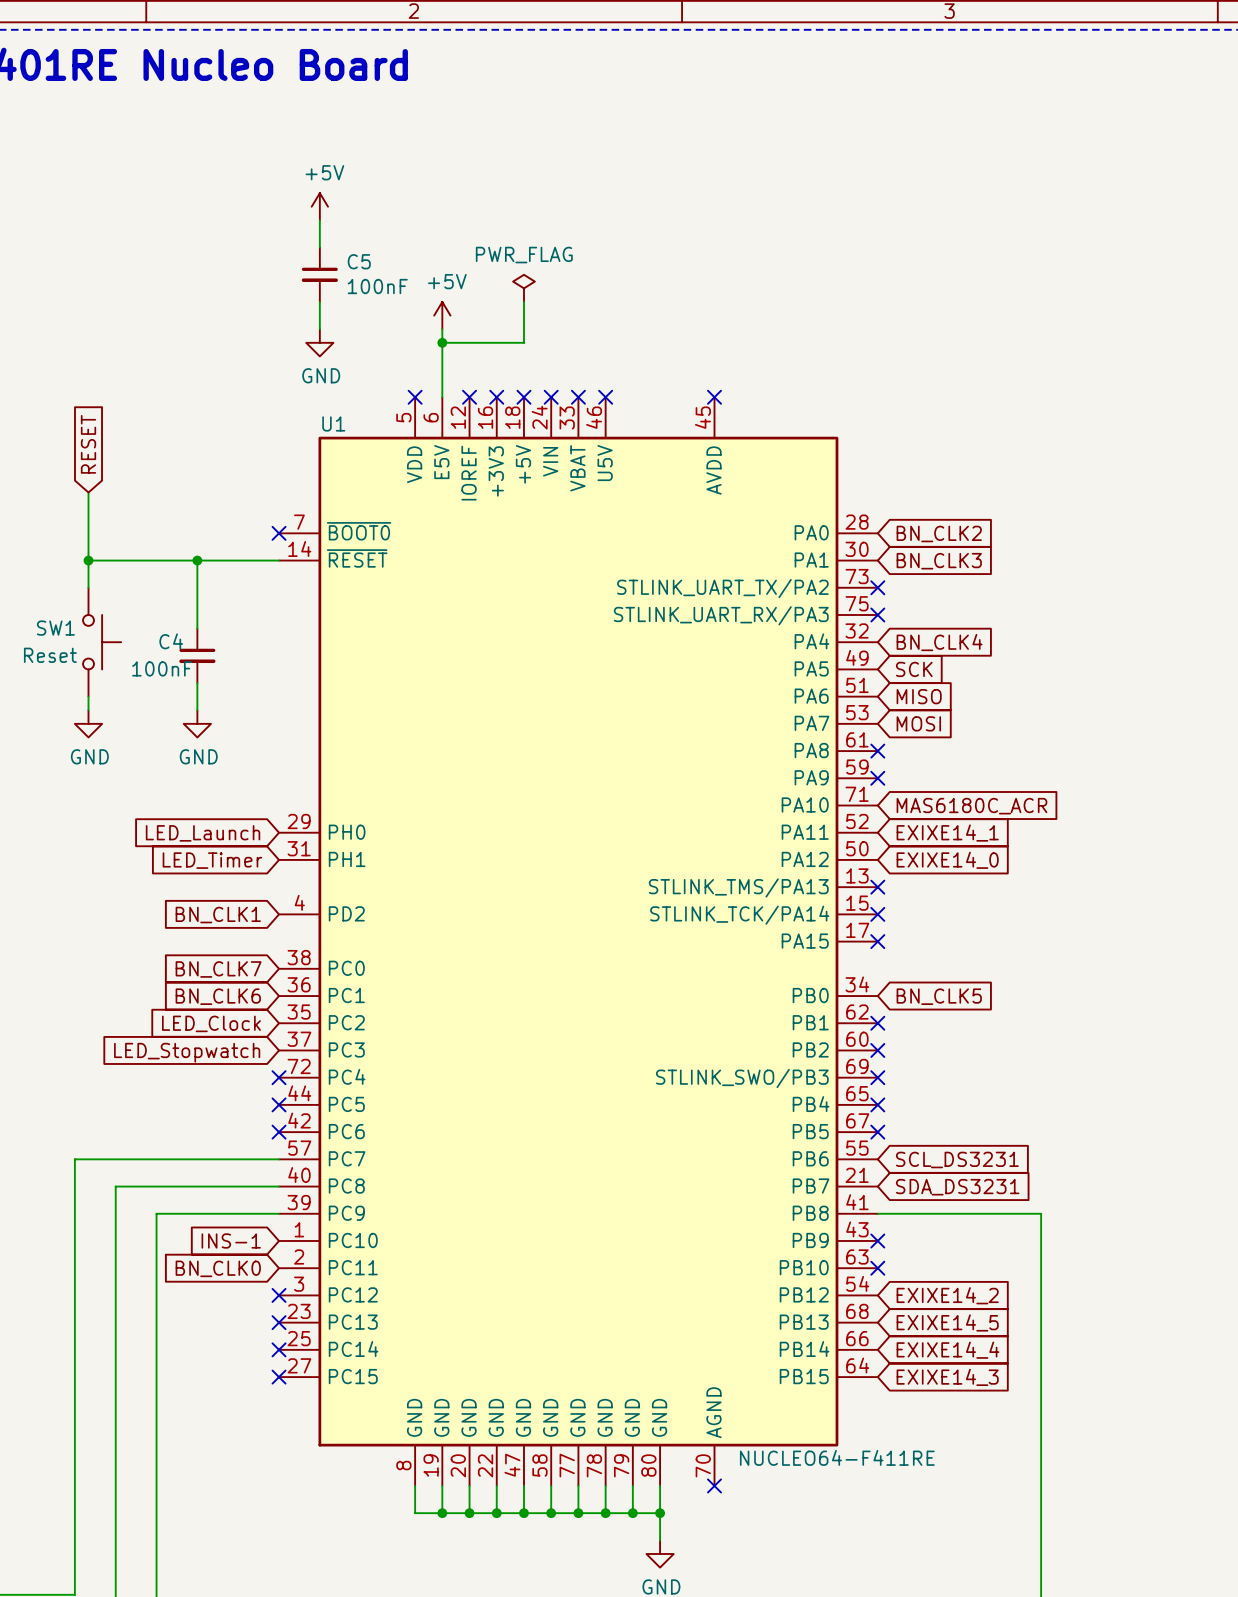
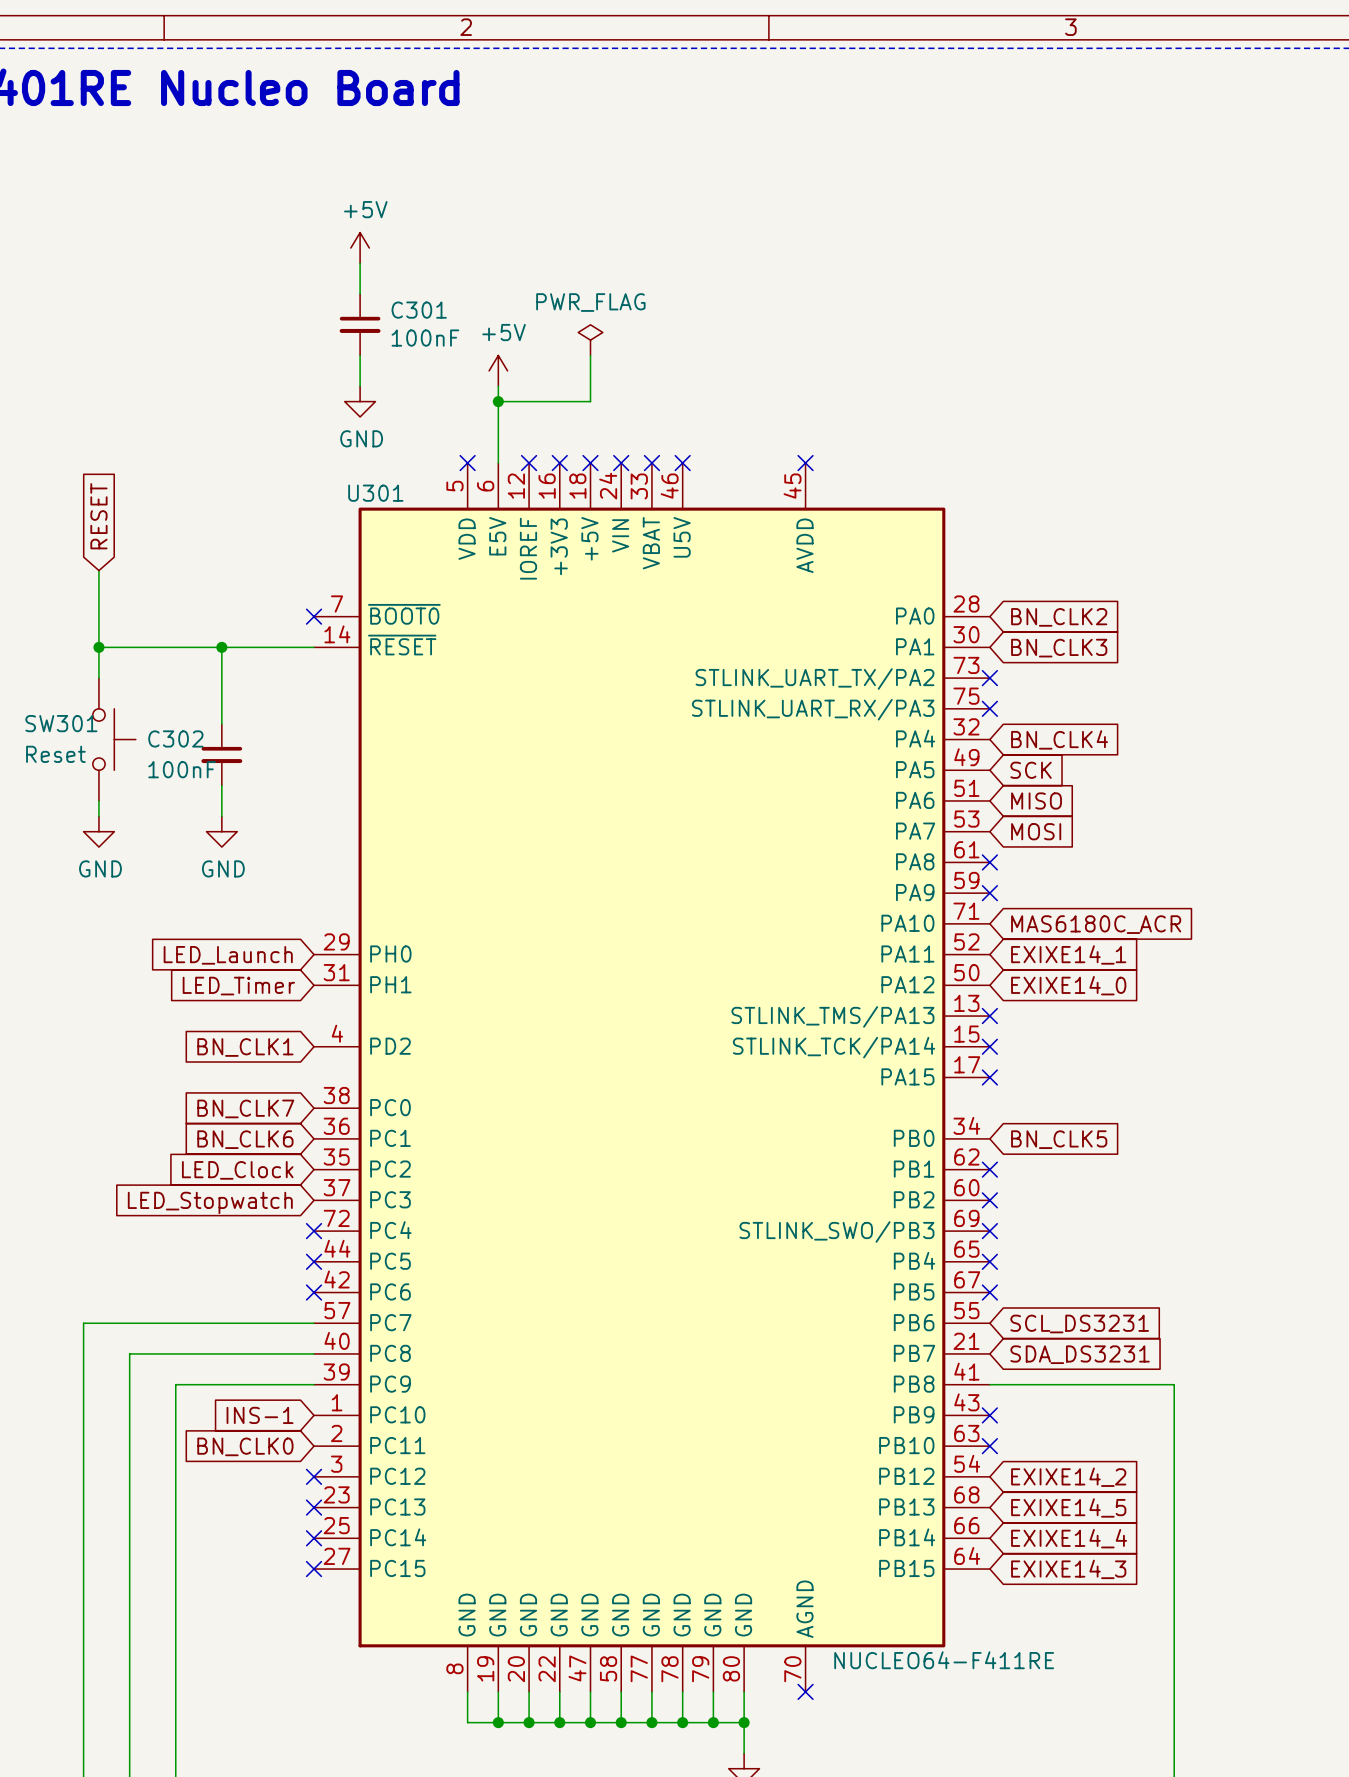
C5 name: C5 (359, 261) -> C301 (419, 310)
U1 name: U1 (333, 423) -> U301 (375, 493)
SW1 name: SW1 (55, 628) -> SW301 (61, 723)
C4 name: C4 (171, 641) -> C302 (175, 738)

